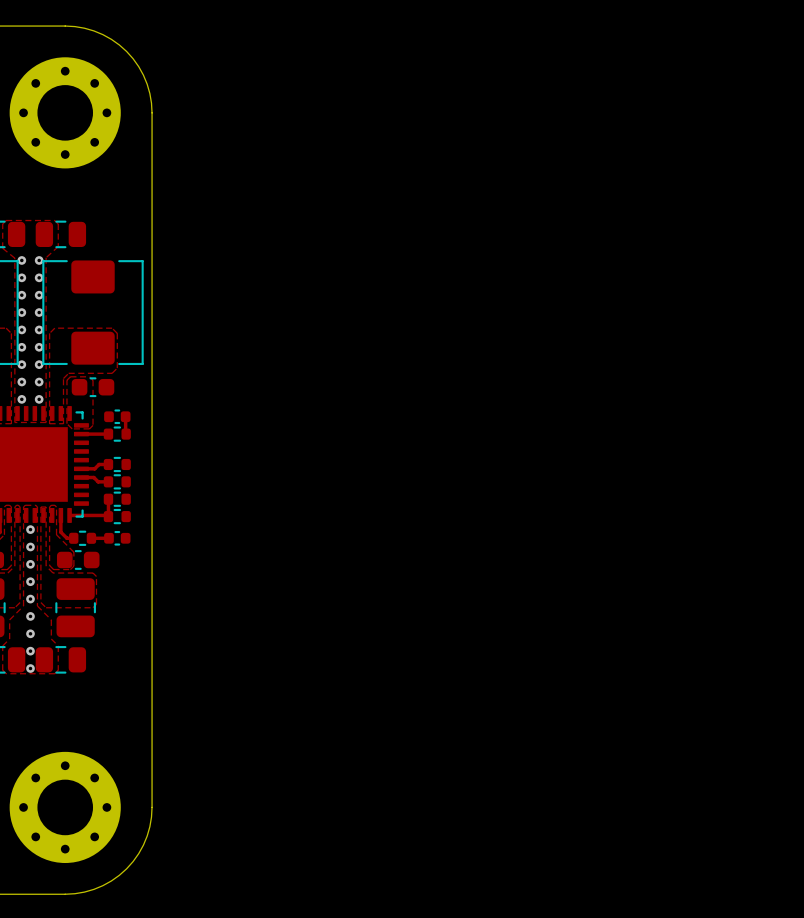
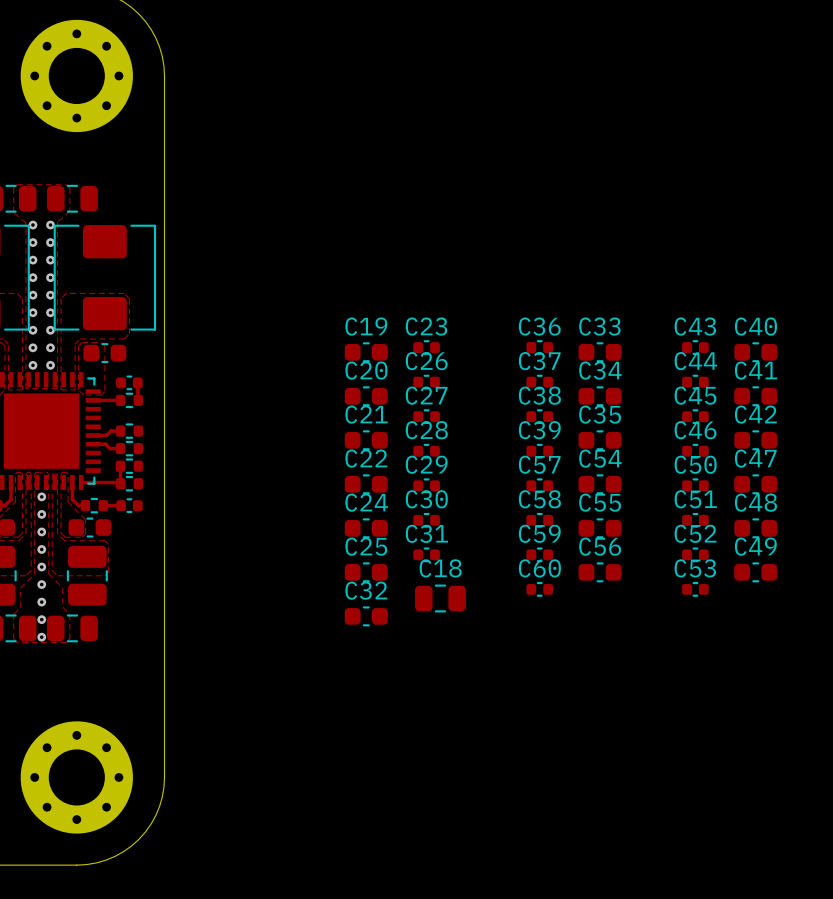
C23: none -> (426, 347)
C36: none -> (539, 347)
C43: none -> (695, 347)
C19: none -> (366, 352)
C33: none -> (600, 352)
C40: none -> (755, 352)
C26: none -> (426, 382)
C37: none -> (539, 382)
C44: none -> (695, 382)
C20: none -> (366, 396)
C34: none -> (600, 396)
C41: none -> (755, 396)
C27: none -> (426, 416)
C38: none -> (539, 416)
C45: none -> (695, 416)
C21: none -> (366, 440)
C35: none -> (600, 440)
C42: none -> (755, 440)
C28: none -> (426, 451)
C39: none -> (539, 451)
C46: none -> (695, 451)
C22: none -> (366, 484)
C54: none -> (600, 484)
C47: none -> (755, 484)
C29: none -> (426, 485)
C57: none -> (539, 485)
C50: none -> (695, 485)
C30: none -> (426, 520)
C58: none -> (539, 520)
C51: none -> (695, 520)
C24: none -> (366, 528)
C55: none -> (600, 528)
C48: none -> (755, 528)
C31: none -> (426, 554)
C59: none -> (539, 554)
C52: none -> (695, 554)
C25: none -> (366, 572)
C56: none -> (600, 572)
C49: none -> (755, 572)
C60: none -> (539, 589)
C53: none -> (695, 589)
C18: none -> (440, 598)
C32: none -> (366, 616)

